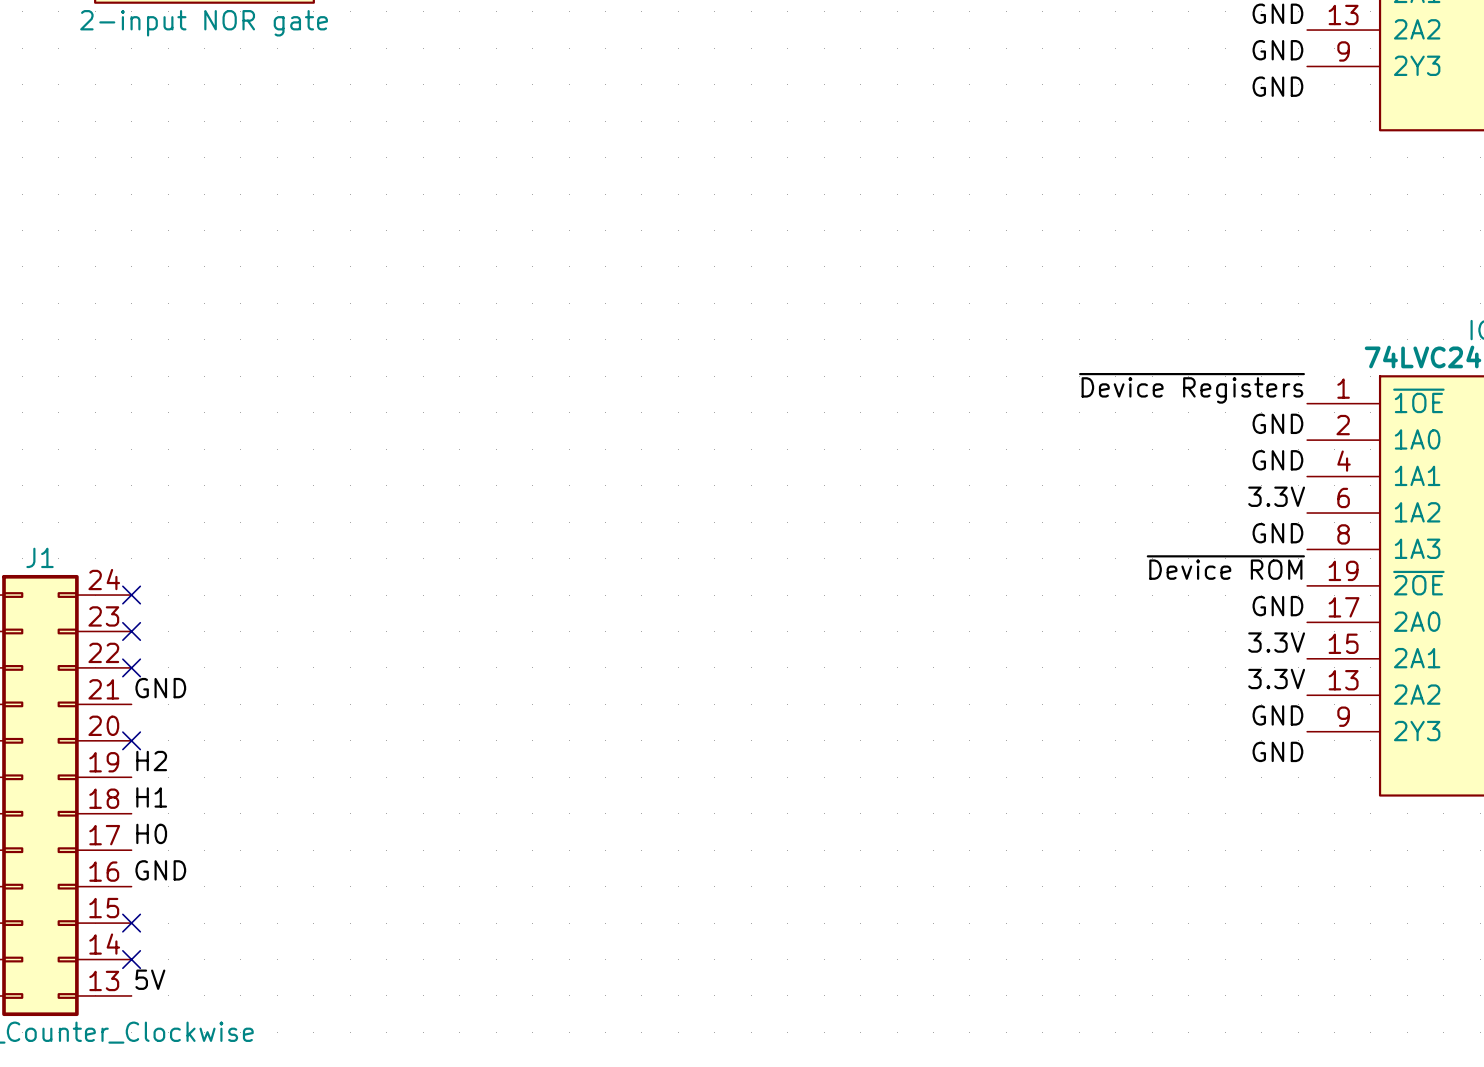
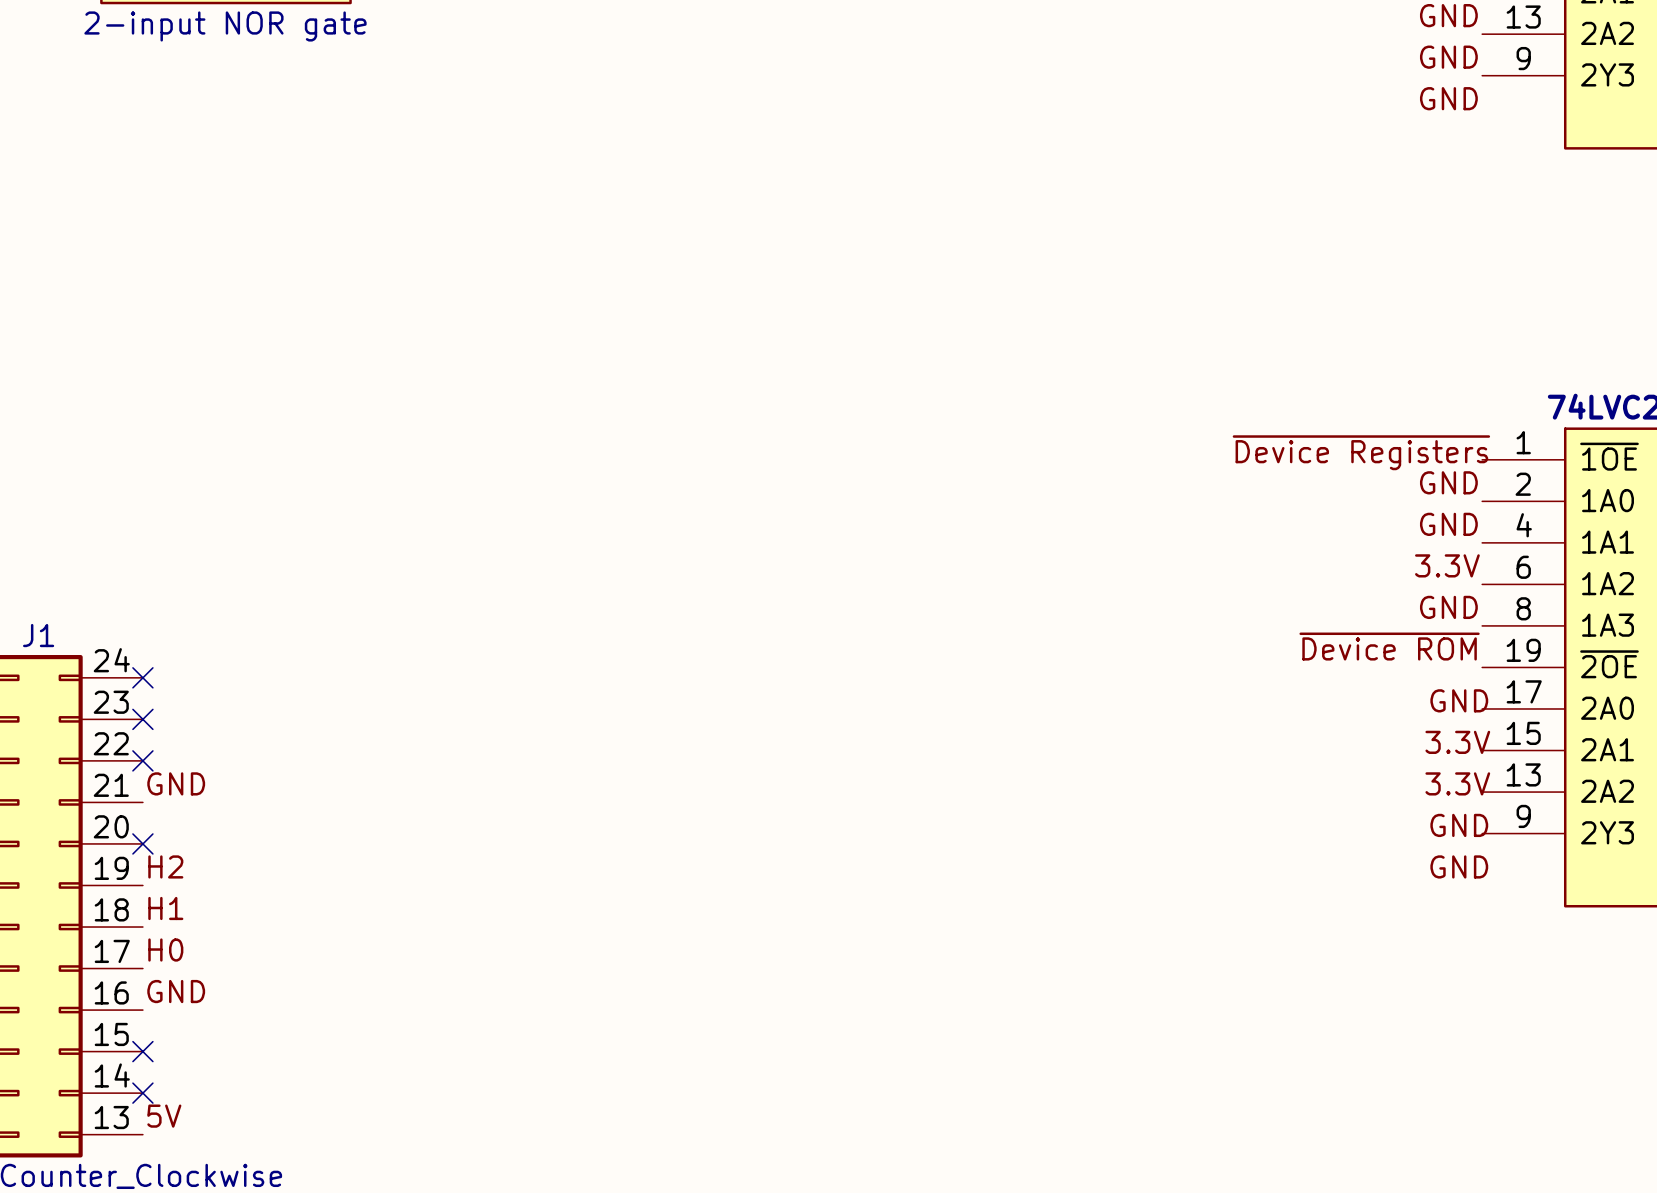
label position: ~{Device Registers} (1192, 388) -> ~{Device Registers} (1361, 452)
label position: GND (1277, 606) -> GND (1459, 700)
label position: 3.3V (1276, 642) -> 3.3V (1457, 742)
label position: 3.3V (1276, 679) -> 3.3V (1457, 783)
label position: GND (1277, 715) -> GND (1459, 825)
label position: GND (1277, 751) -> GND (1459, 866)

